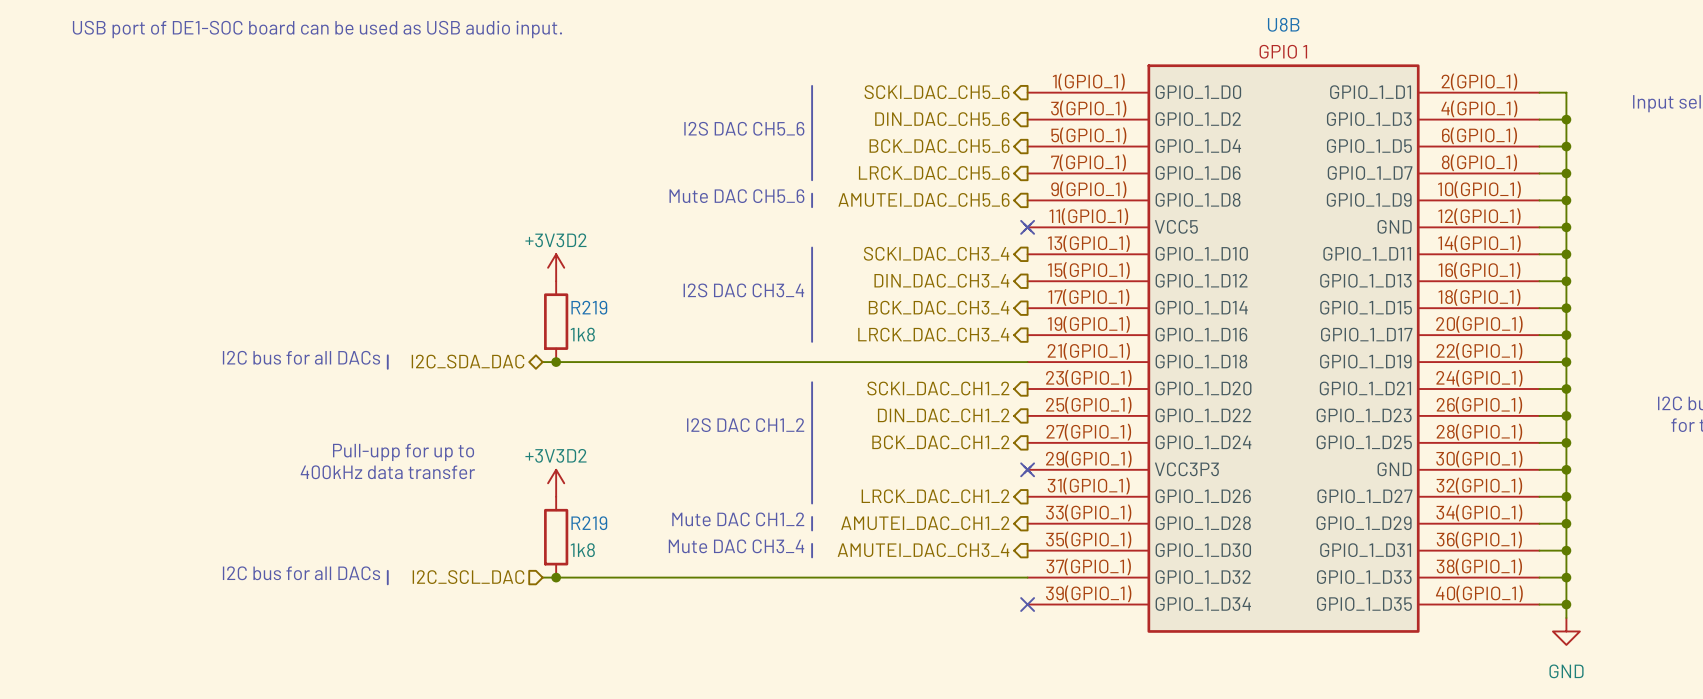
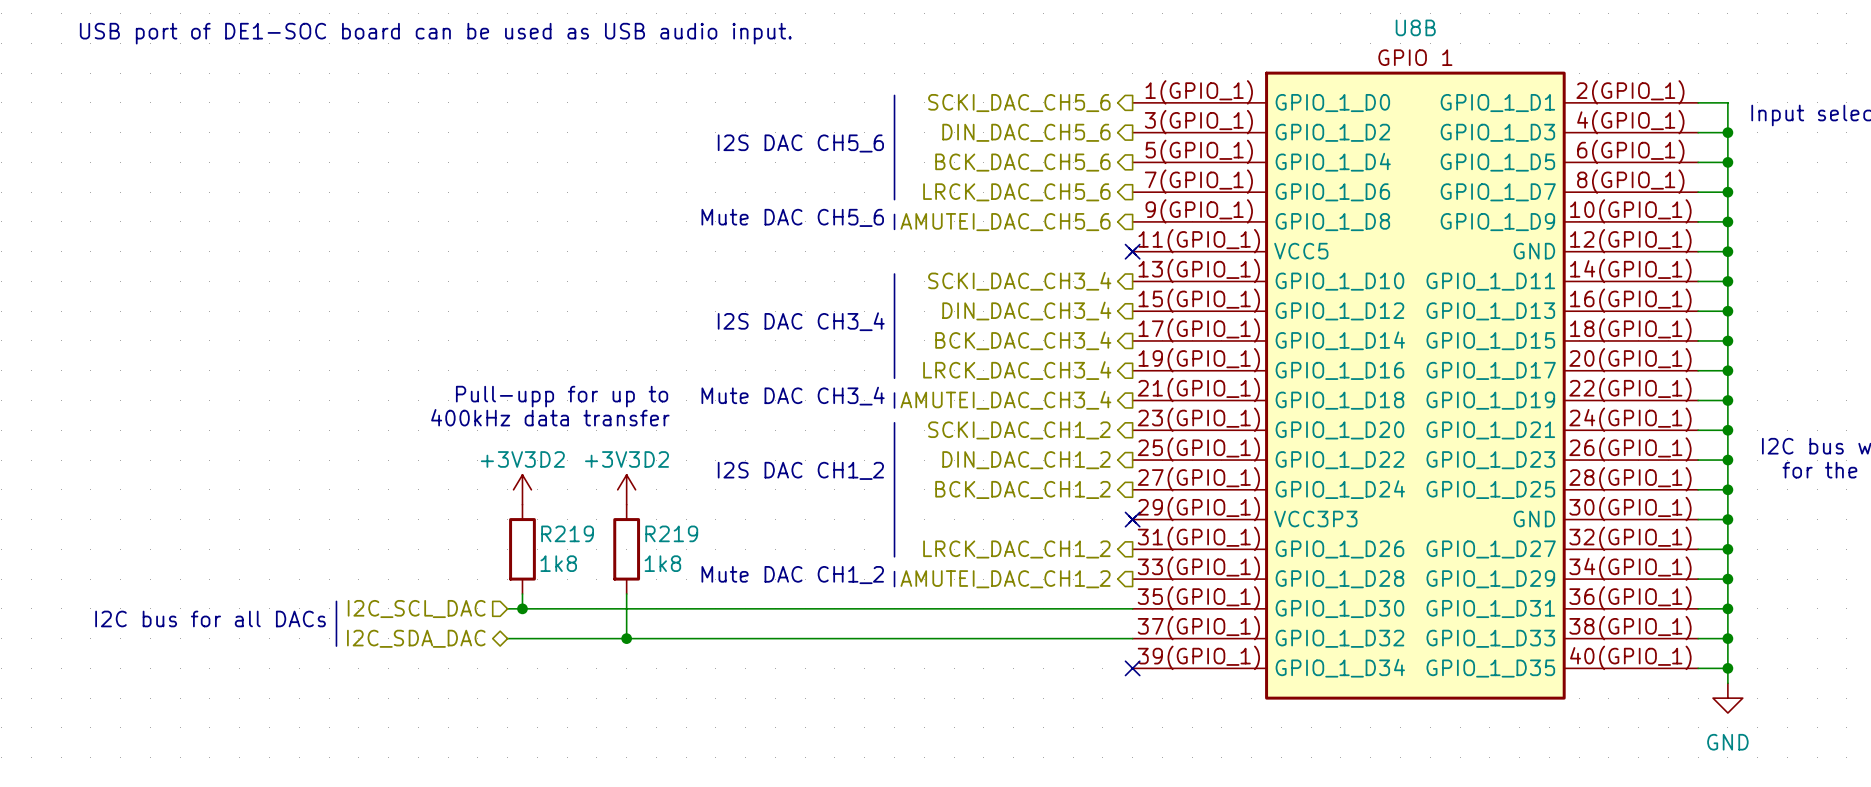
power symbol: +3V3D2 (556, 267) -> none
R219: 1k8 (556, 321) -> none
line: (387, 355) (387, 368) -> none
text: I2C bus for all DACs (301, 357) -> none
hierarchical label position: I2C_SDA_DAC (468, 361) -> I2C_SDA_DAC (416, 638)
wire: (542, 362) (1027, 362) -> none
junction: (556, 362) -> none
power symbol: none -> +3V3D2 (522, 489)
text position: Pull-upp for up to (403, 452) -> Pull-upp for up to (562, 396)
text position: 400kHz data transfer (387, 472) -> 400kHz data transfer (550, 417)
power symbol position: +3V3D2 (556, 483) -> +3V3D2 (626, 489)
R219: none -> 1k8 (522, 549)
wire: none -> (522, 593) (522, 608)
R219 position: (556, 537) -> (626, 549)
wire: none -> (626, 593) (626, 638)
line: none -> (336, 601) (336, 646)
line: (812, 543) (812, 557) -> (894, 393) (894, 407)
text position: Mute DAC CH3_4 (736, 546) -> Mute DAC CH3_4 (793, 396)
wire: none -> (507, 608) (1132, 608)
junction: none -> (522, 608)
hierarchical label position: AMUTEI_DAC_CH3_4 (923, 550) -> AMUTEI_DAC_CH3_4 (1005, 400)
line: (387, 570) (387, 584) -> none
text position: I2C bus for all DACs (301, 573) -> I2C bus for all DACs (210, 618)
wire: none -> (507, 638) (596, 638)
hierarchical label position: I2C_SCL_DAC (468, 577) -> I2C_SCL_DAC (416, 609)
junction position: (556, 577) -> (626, 638)

